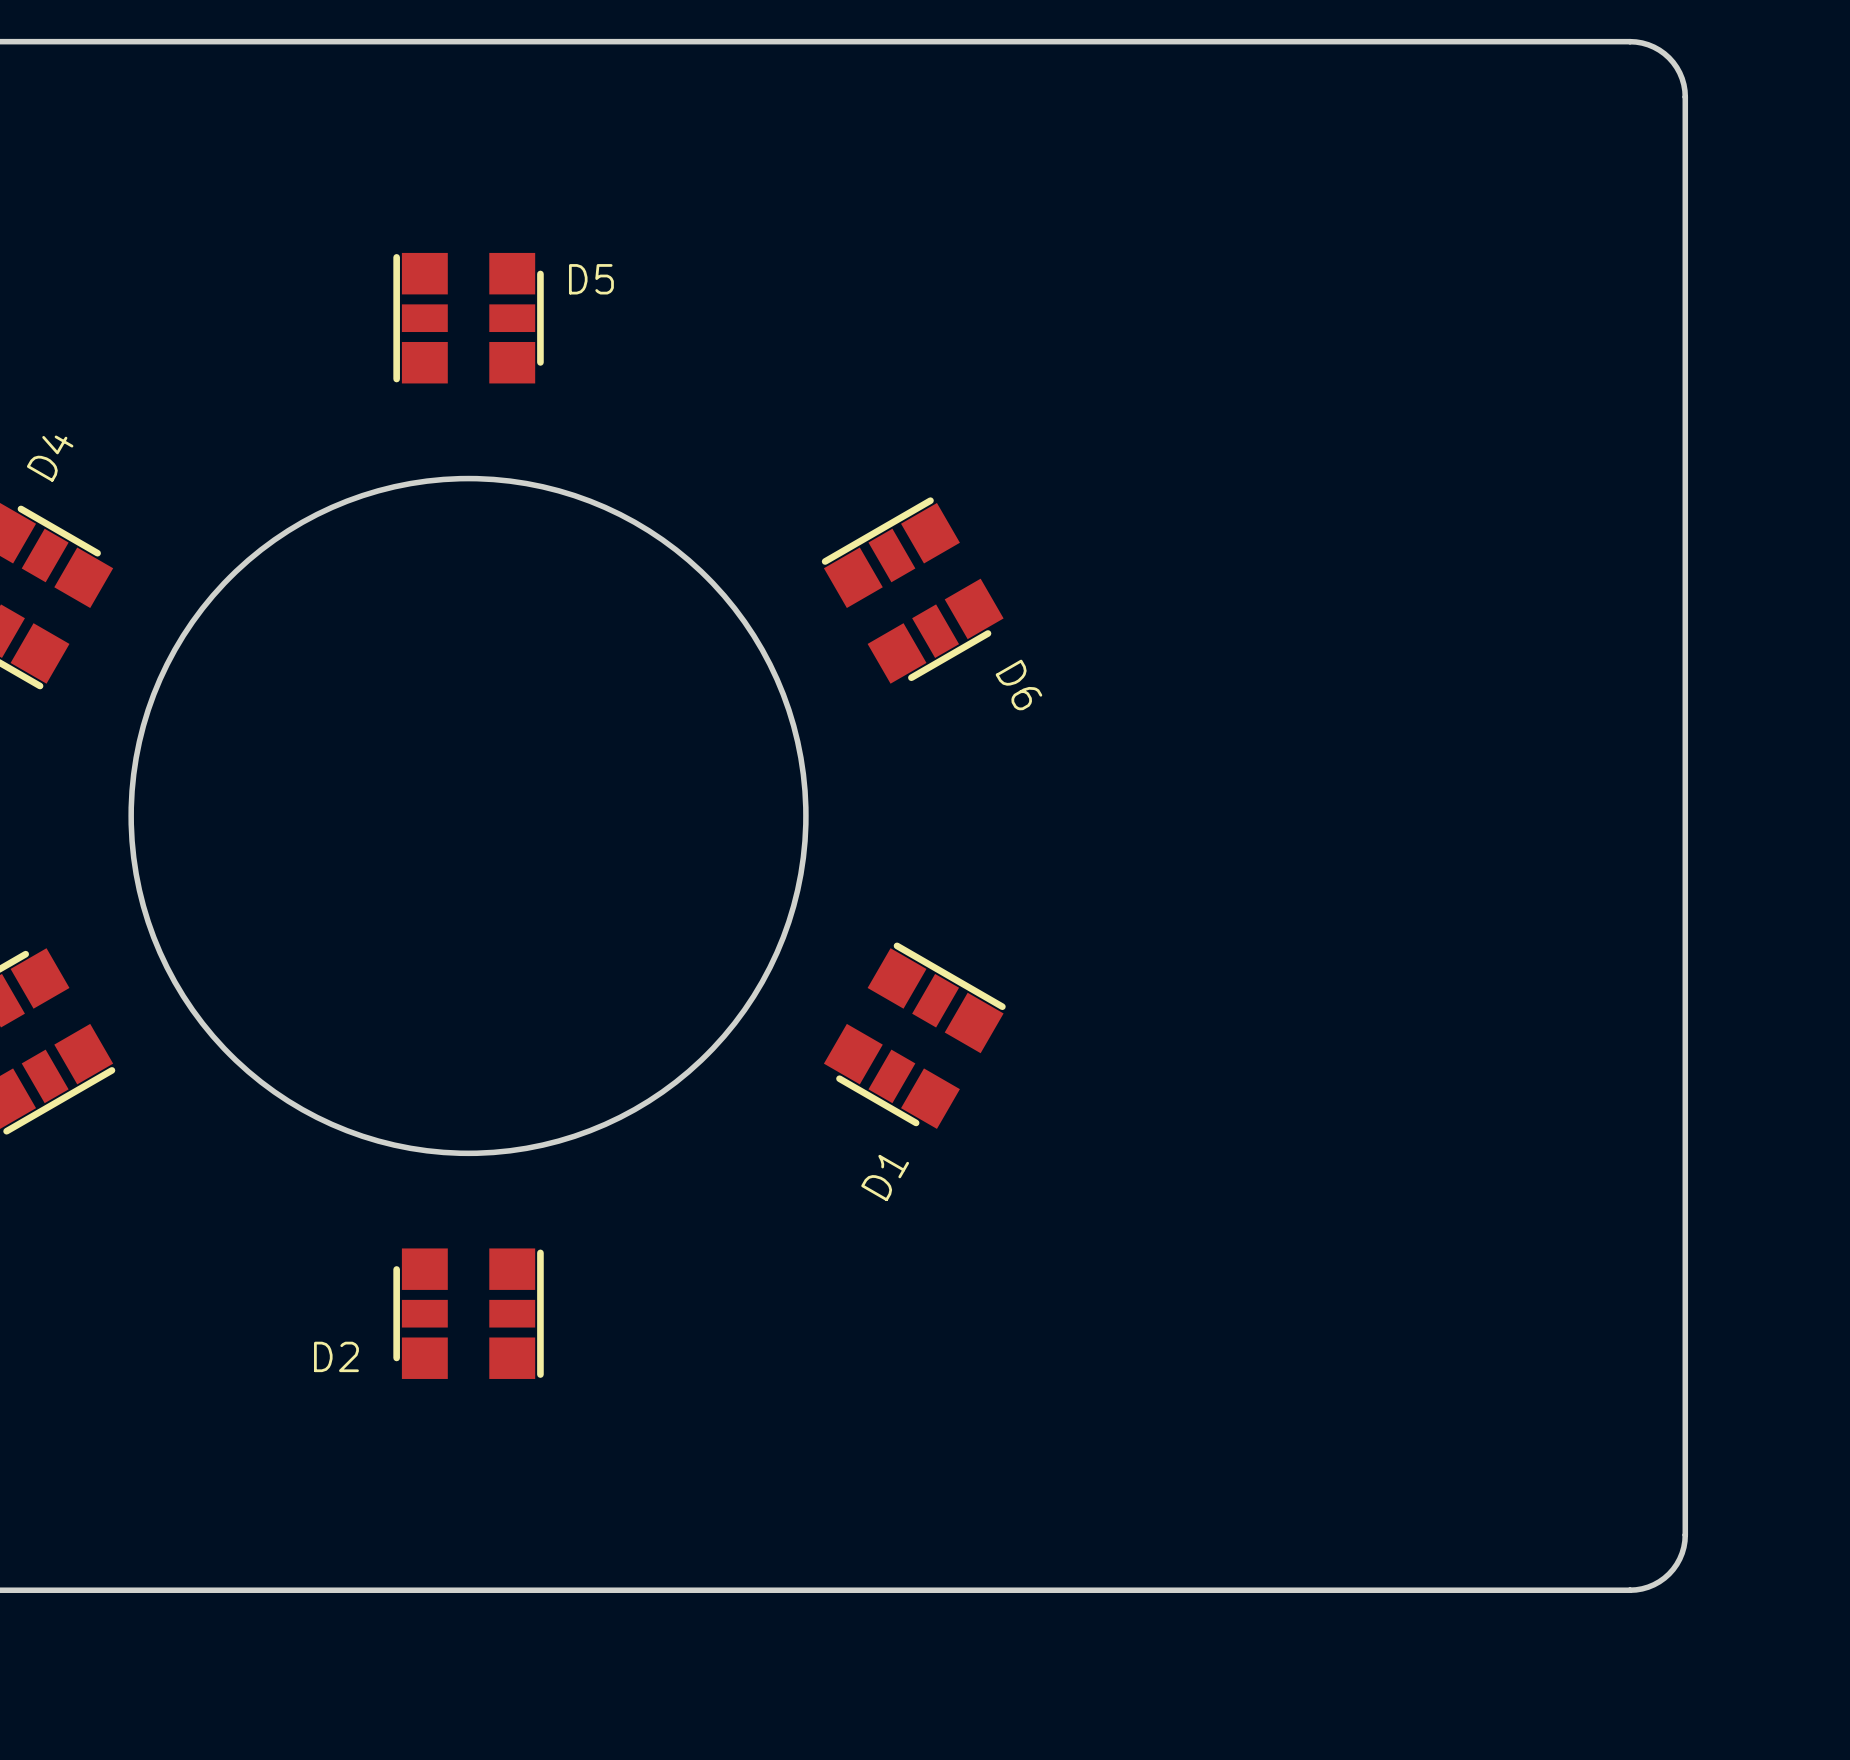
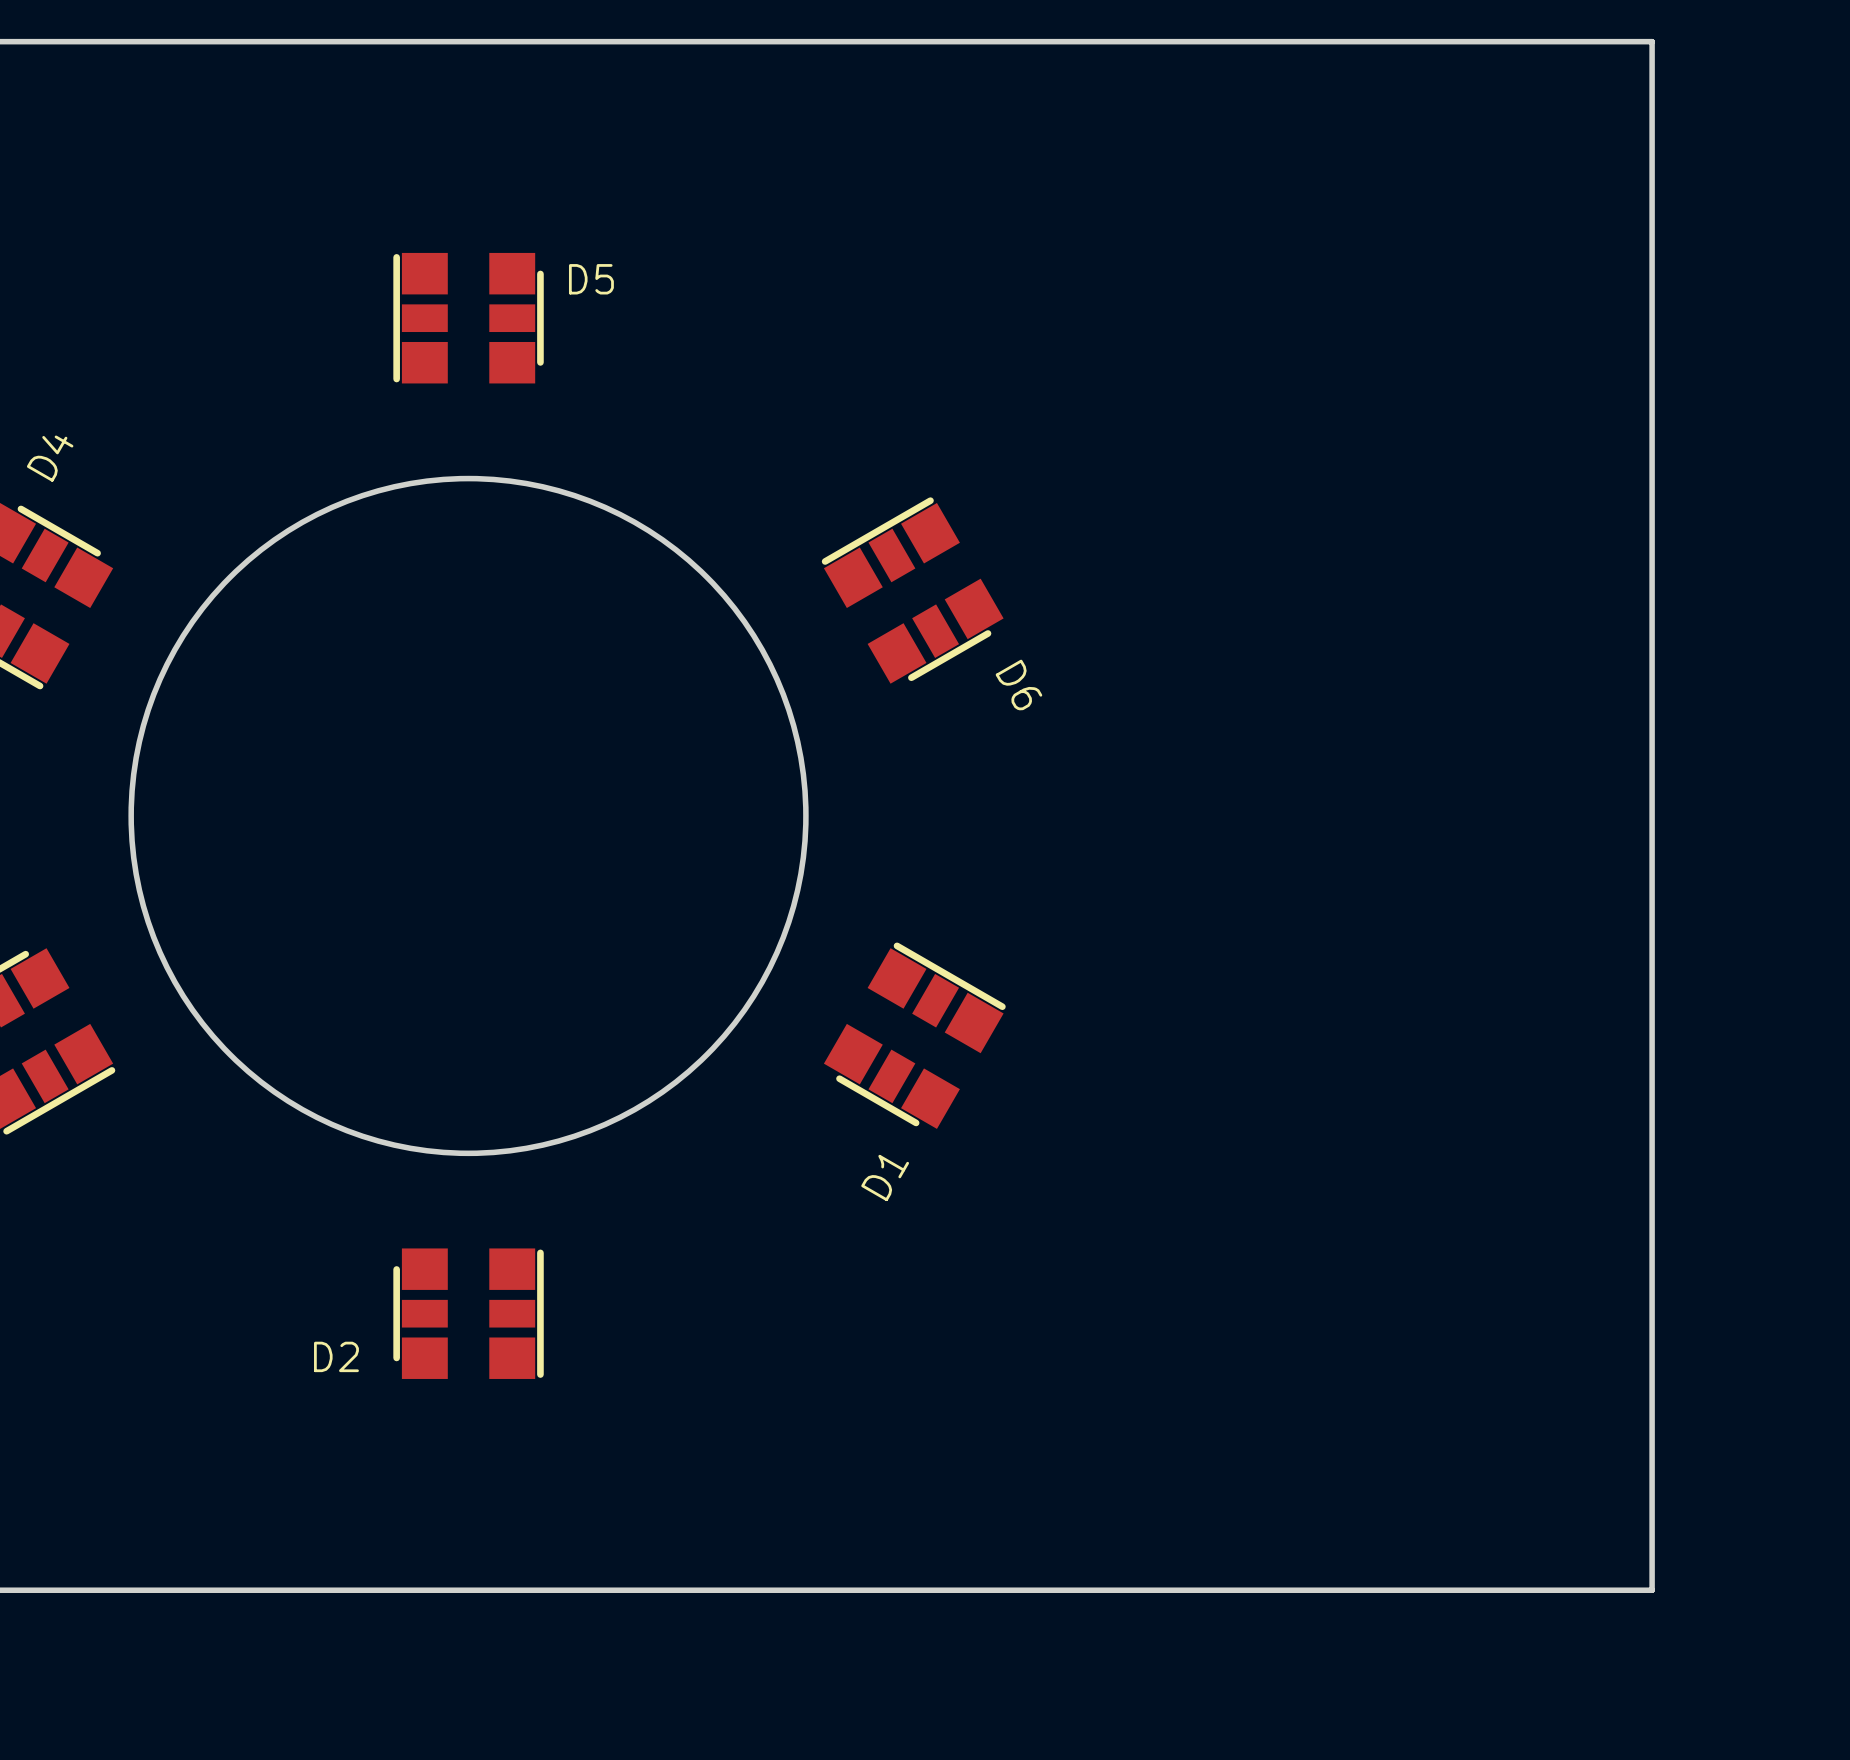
board edge: (1629, 41) (1653, 47) (1669, 57) (1682, 78) (1685, 96) (1685, 1534) (1682, 1553) (1669, 1574) (1648, 1587) (1629, 1590) -> (1629, 41) (1652, 41) (1652, 1590) (1629, 1590)

